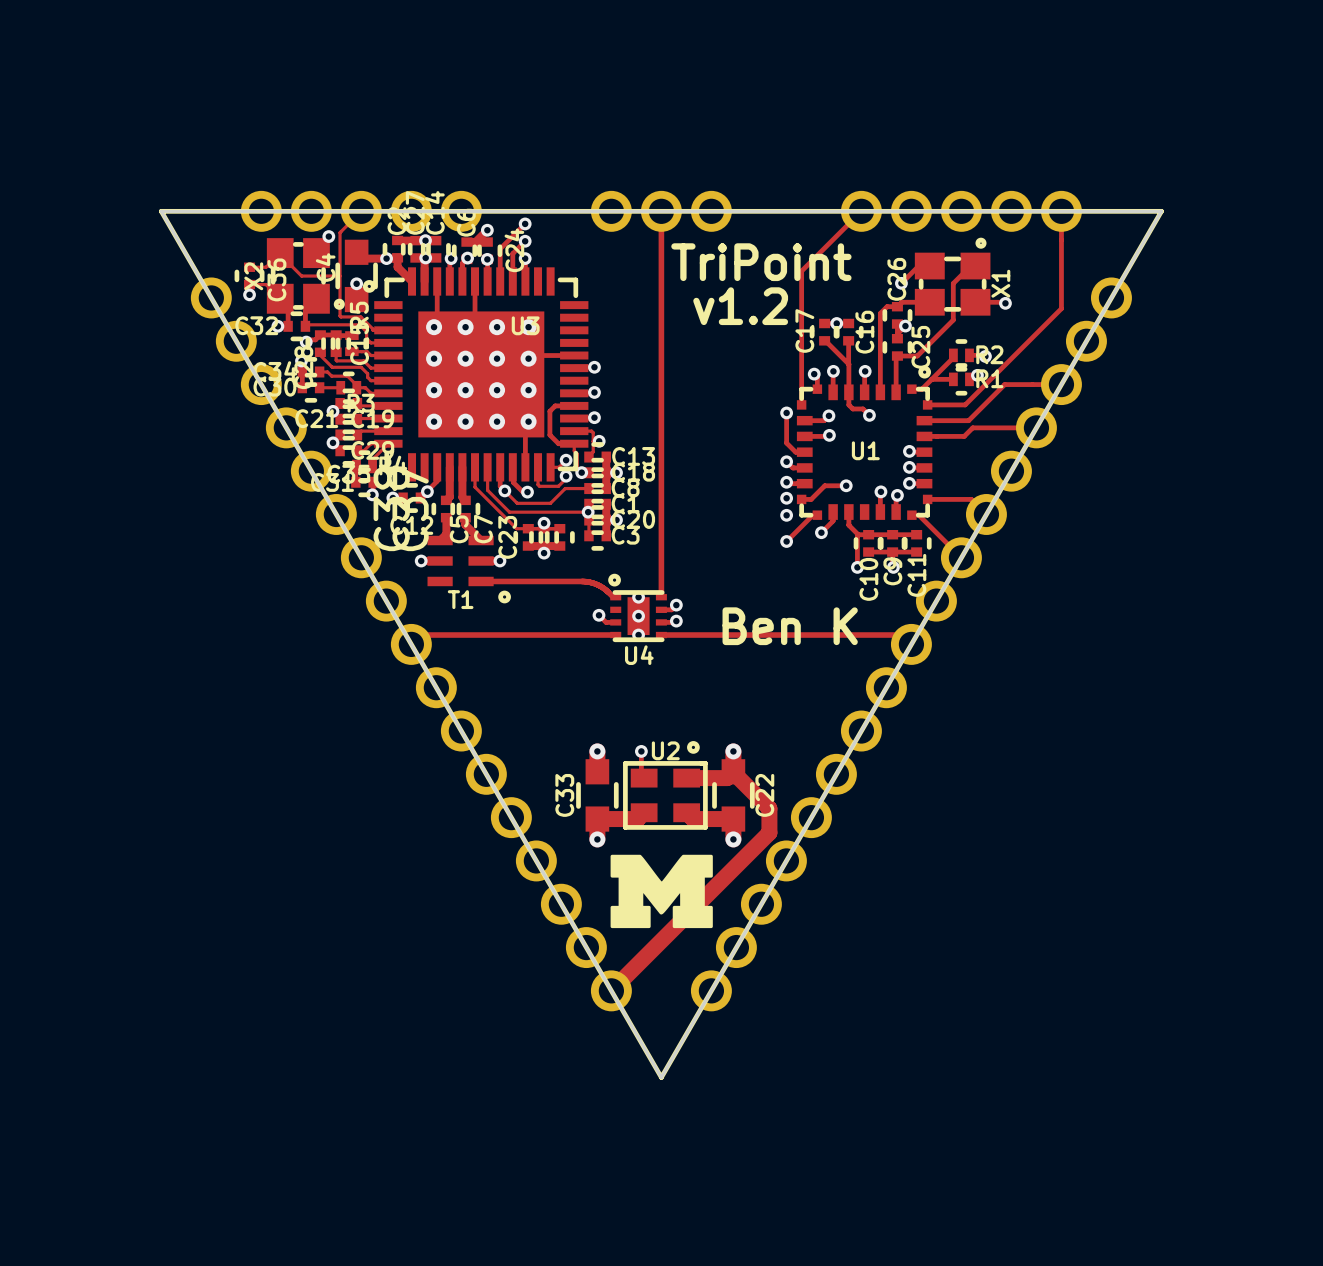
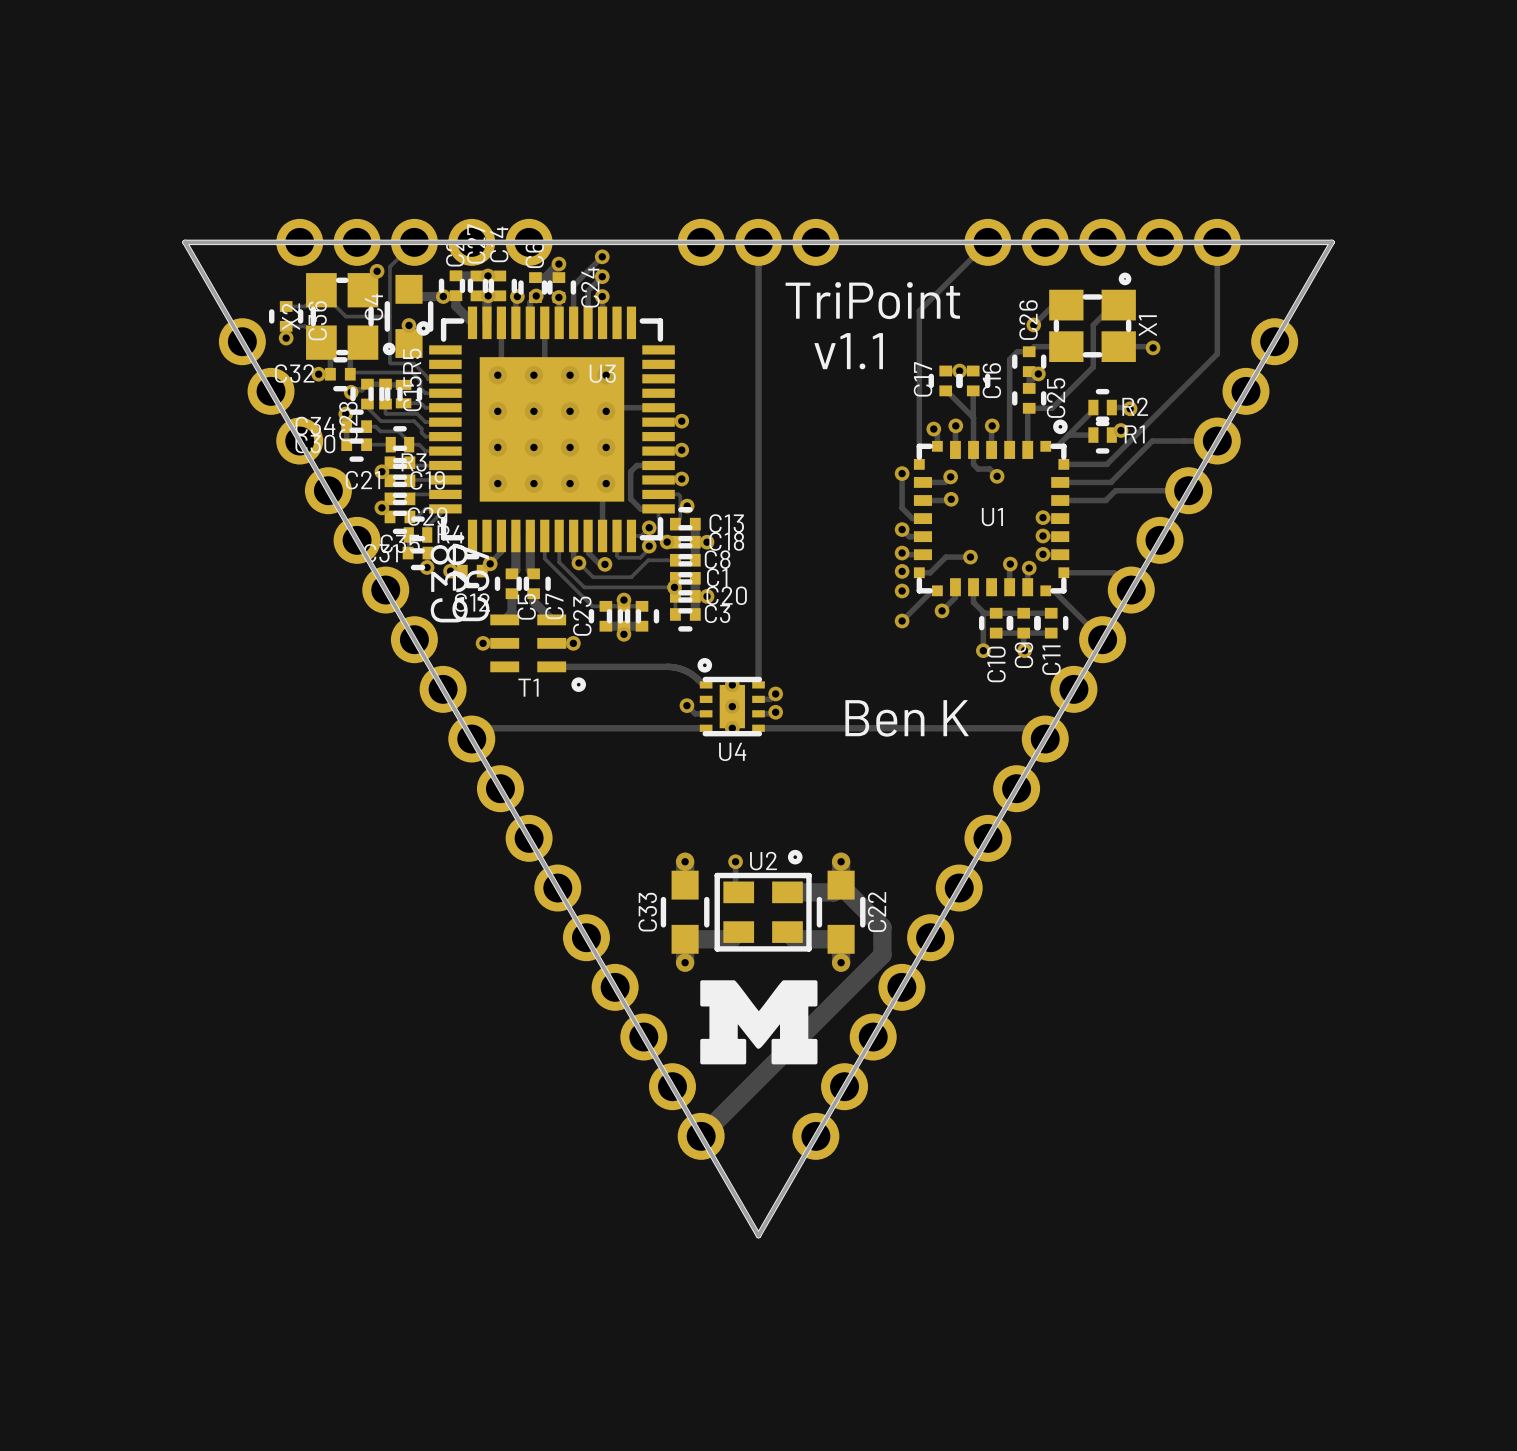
text: v1.2 (740, 306) -> v1.1 (848, 351)

